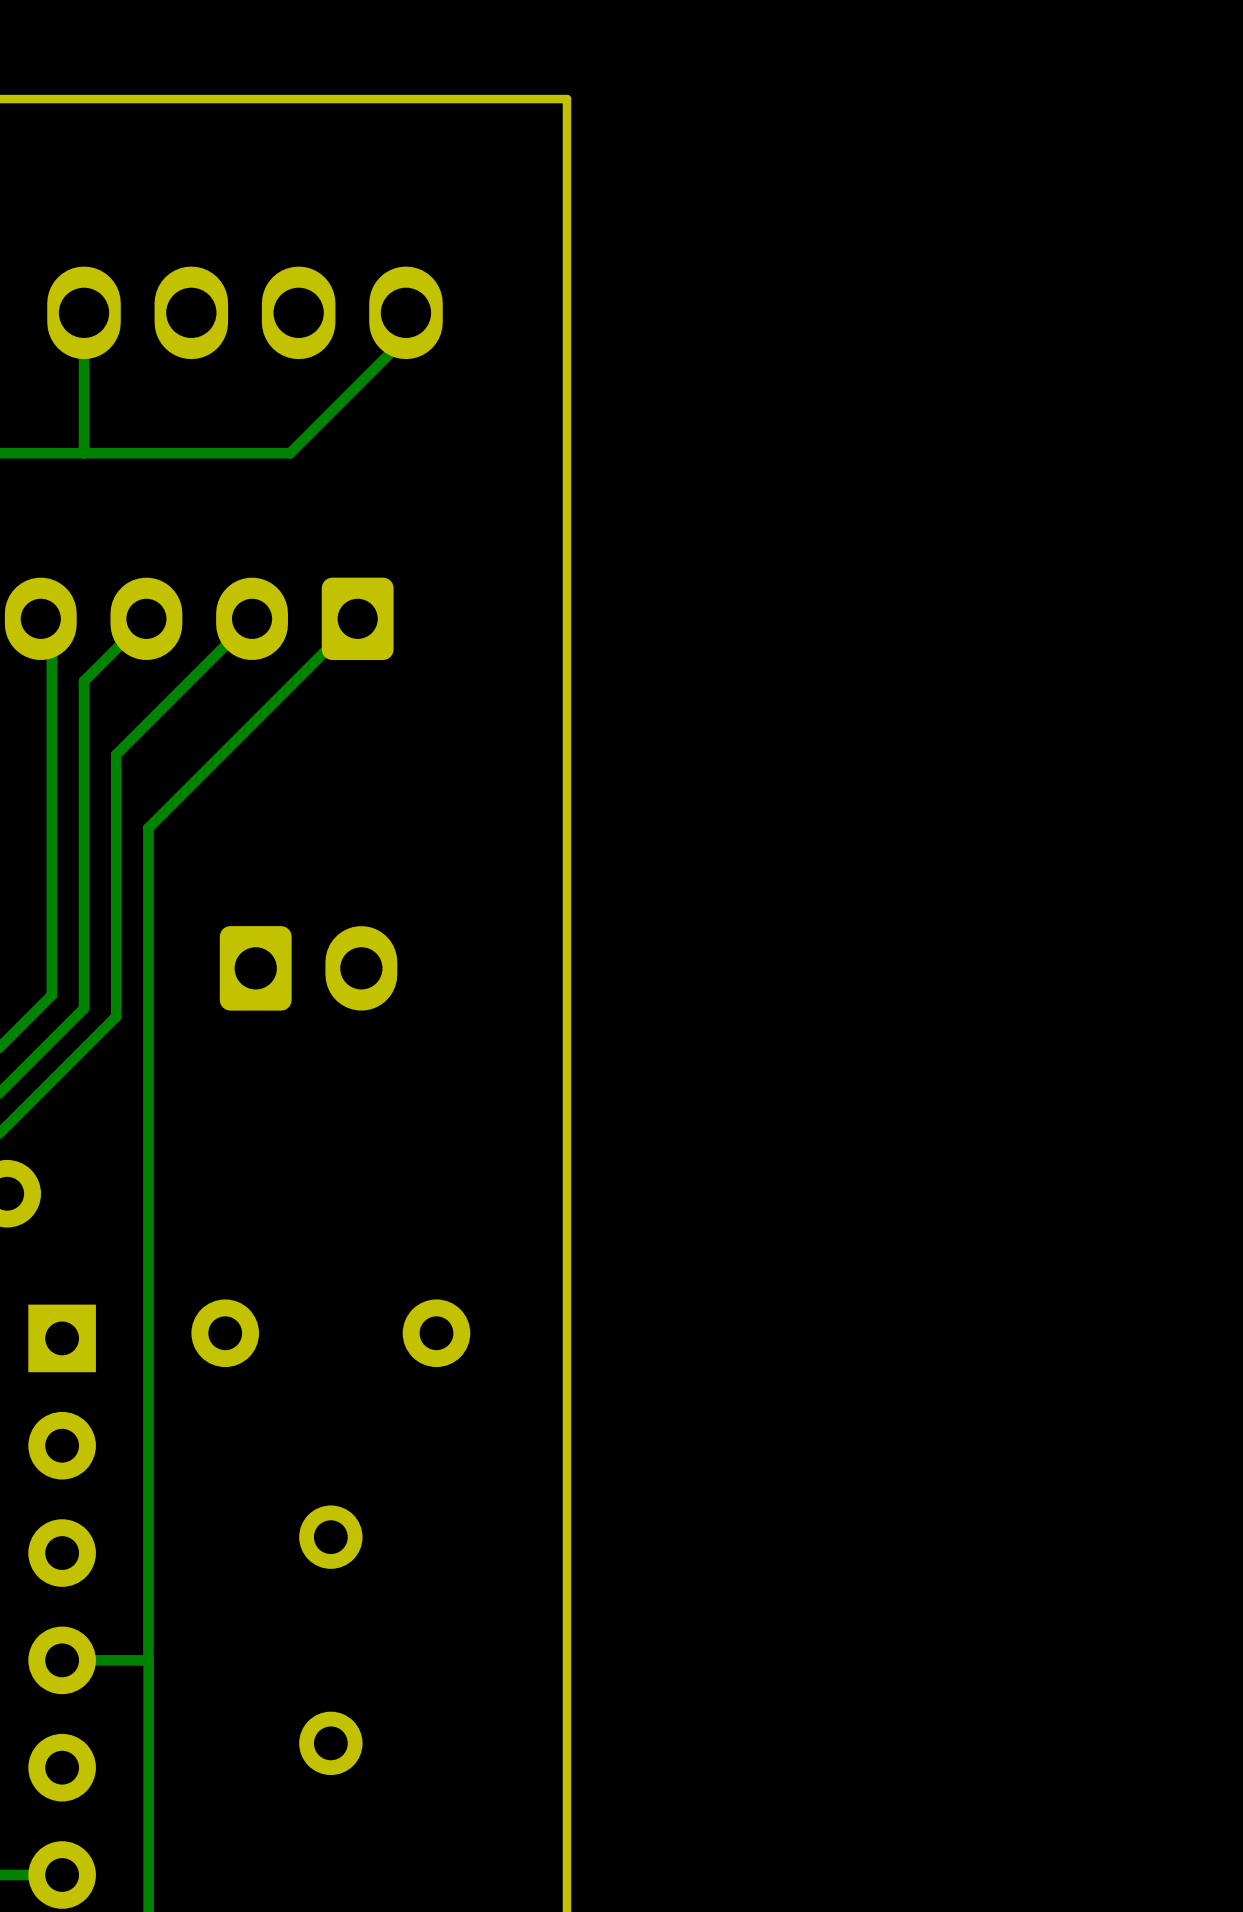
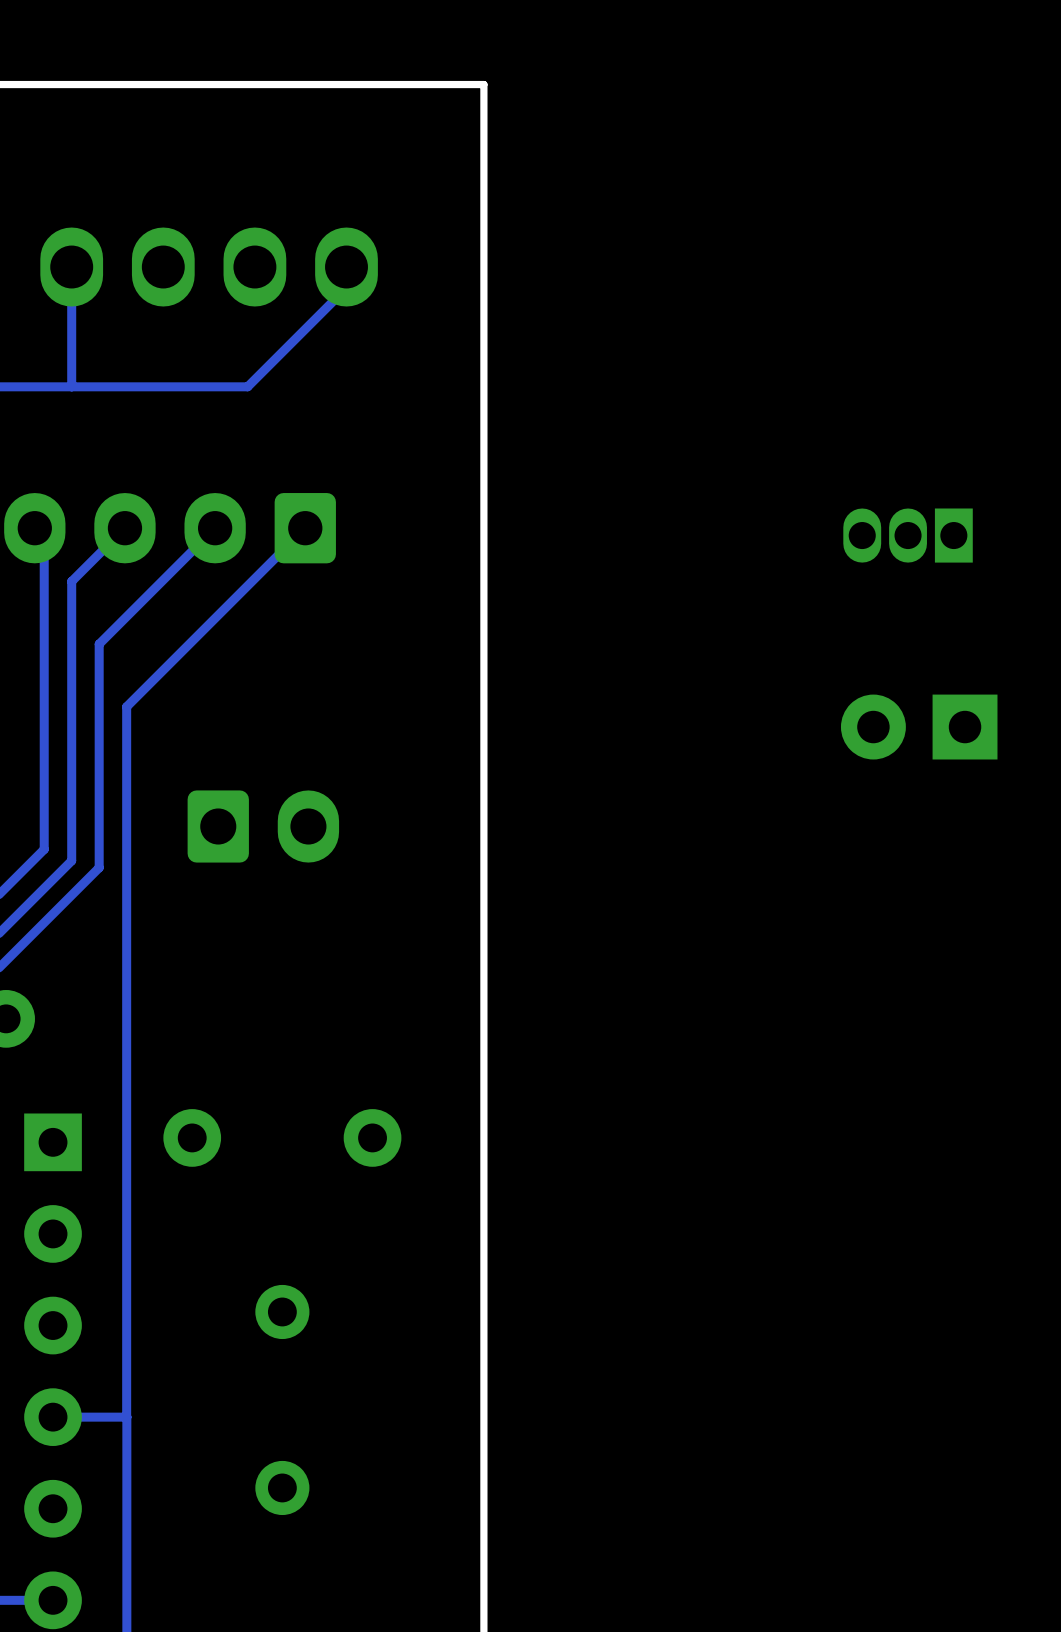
part: none -> (908, 535)
part: none -> (919, 727)

